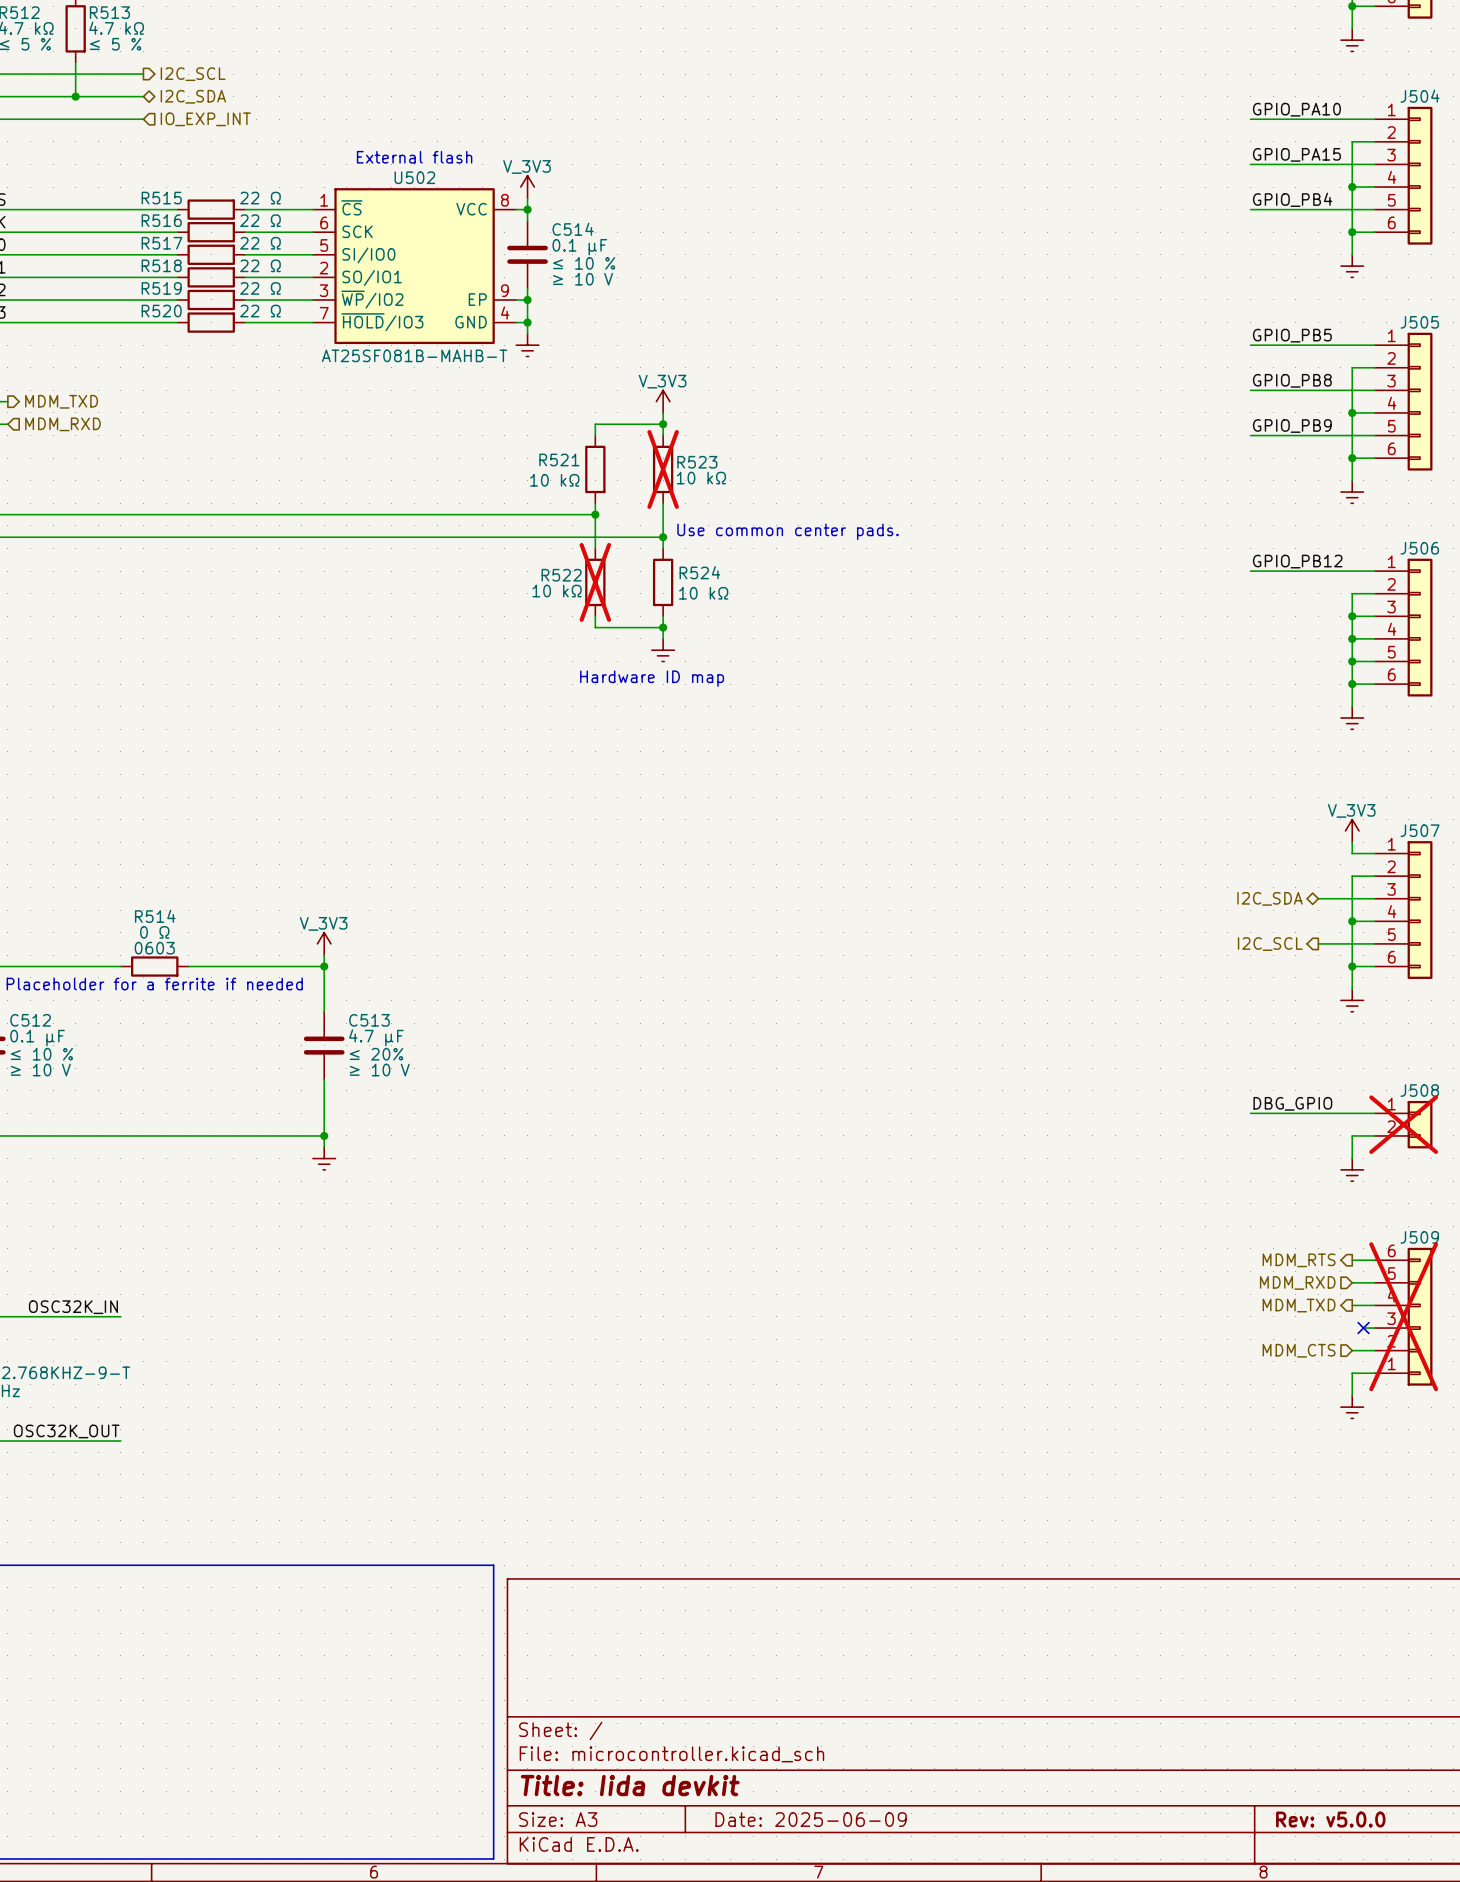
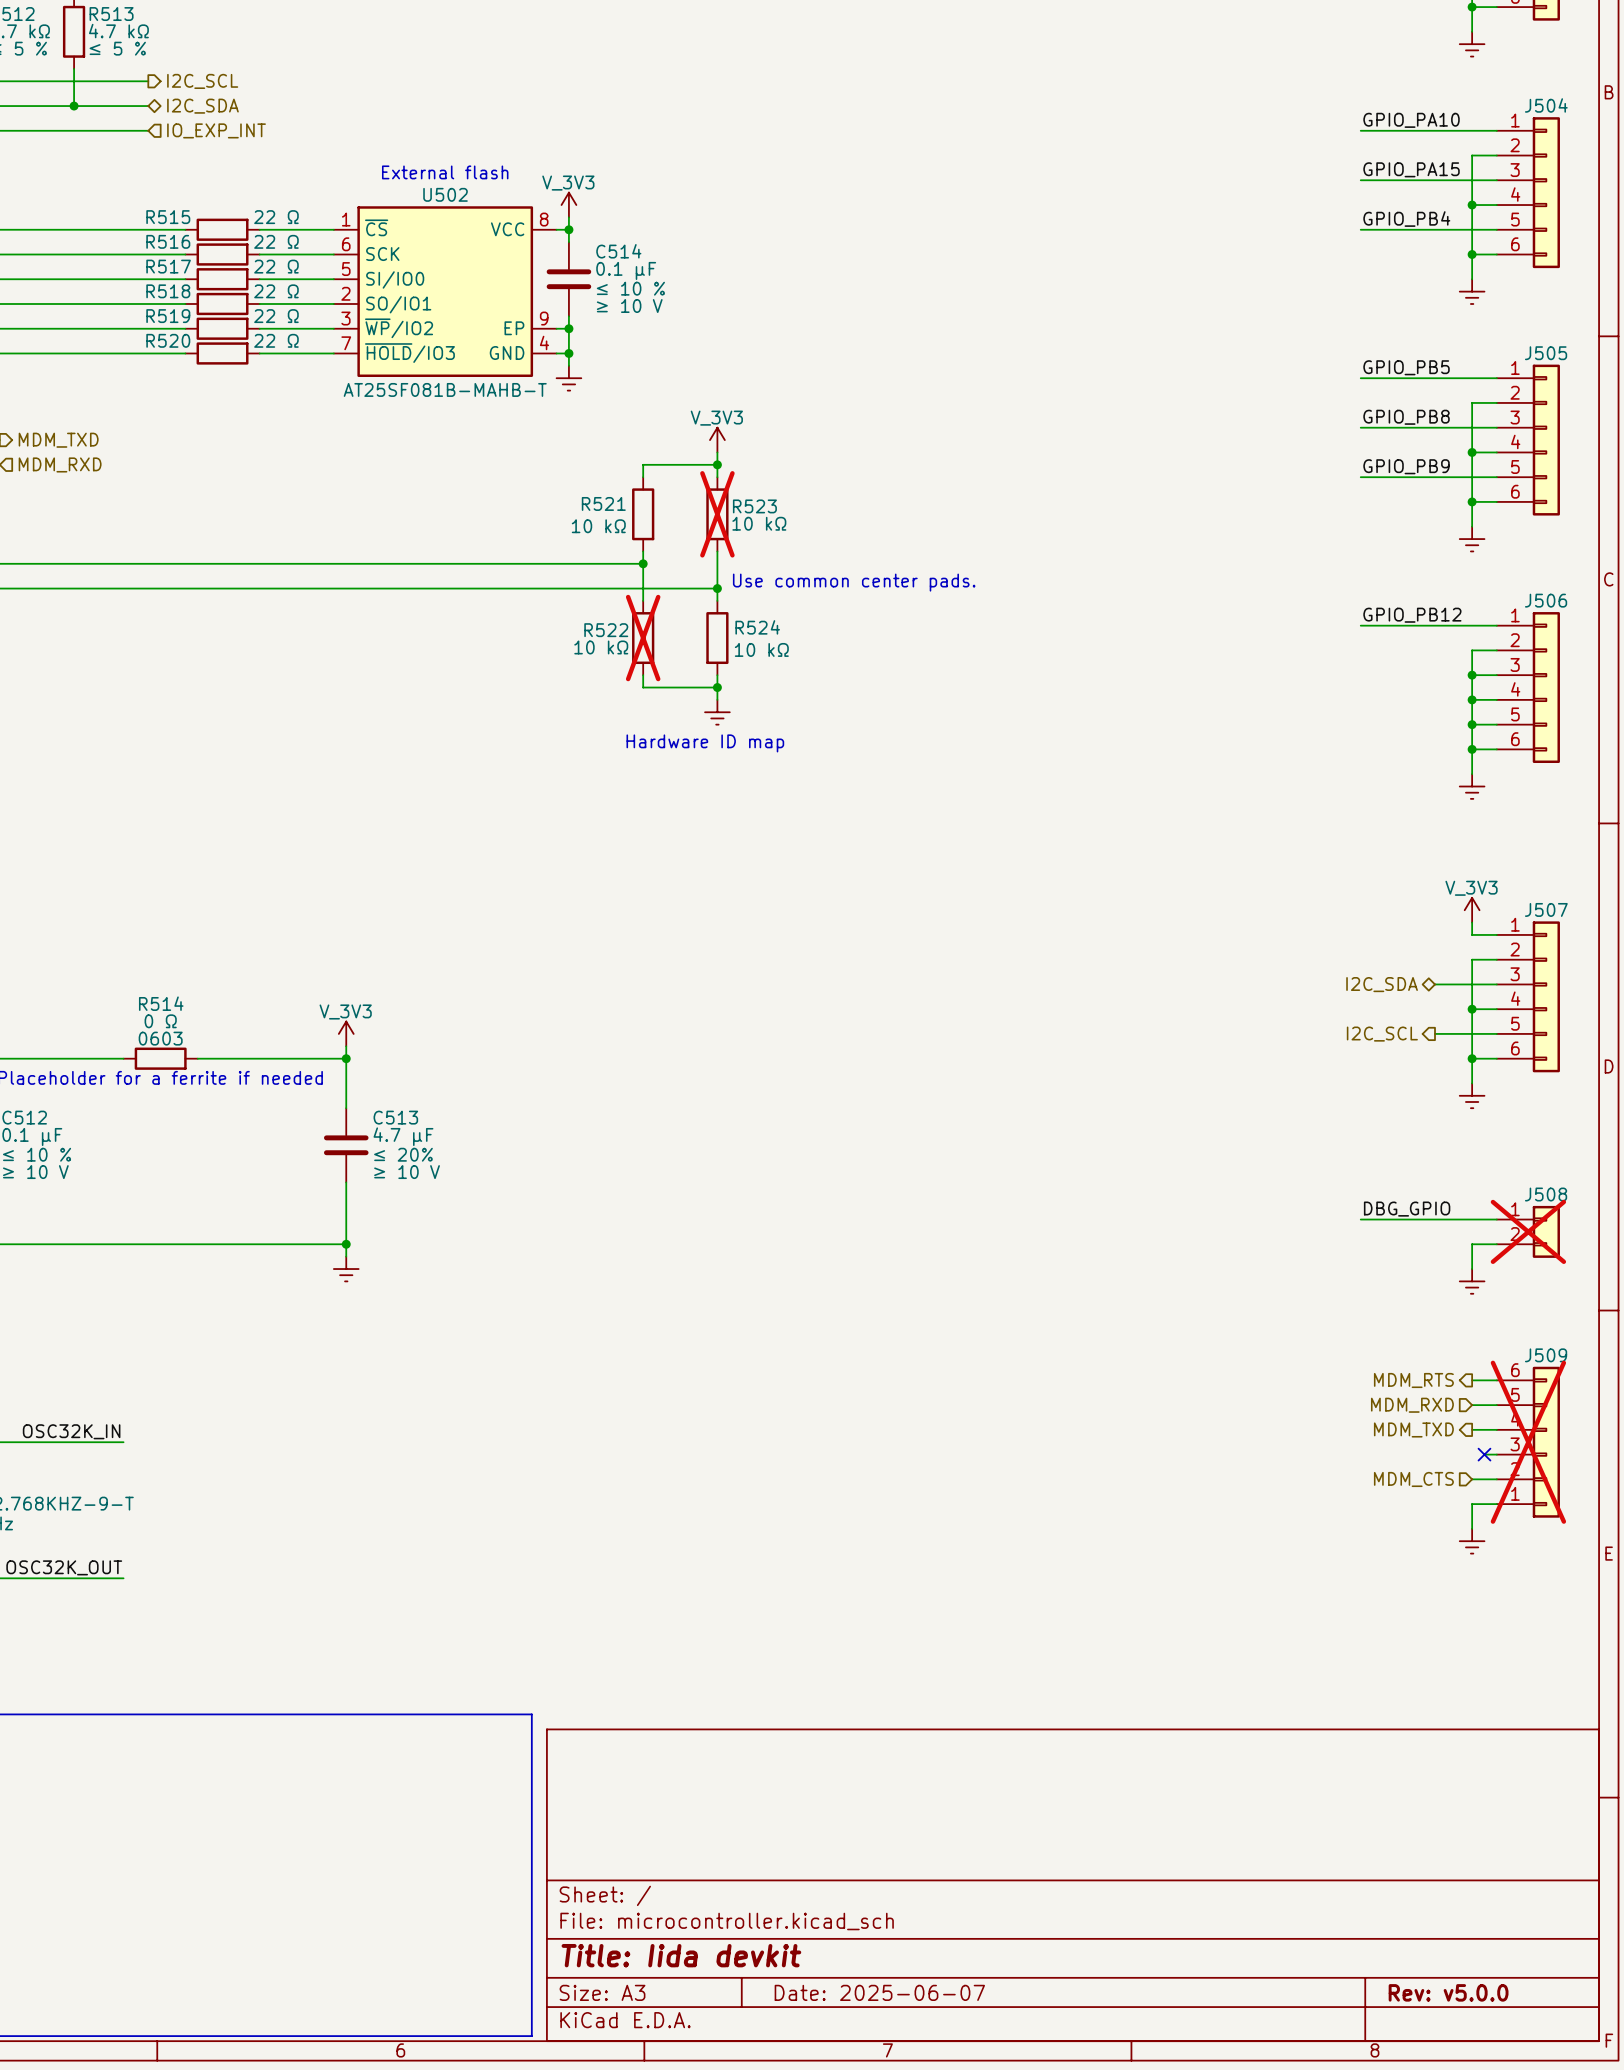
title block: Date: 2025-06-09 (811, 1819) -> Date: 2025-06-07 (879, 1992)

